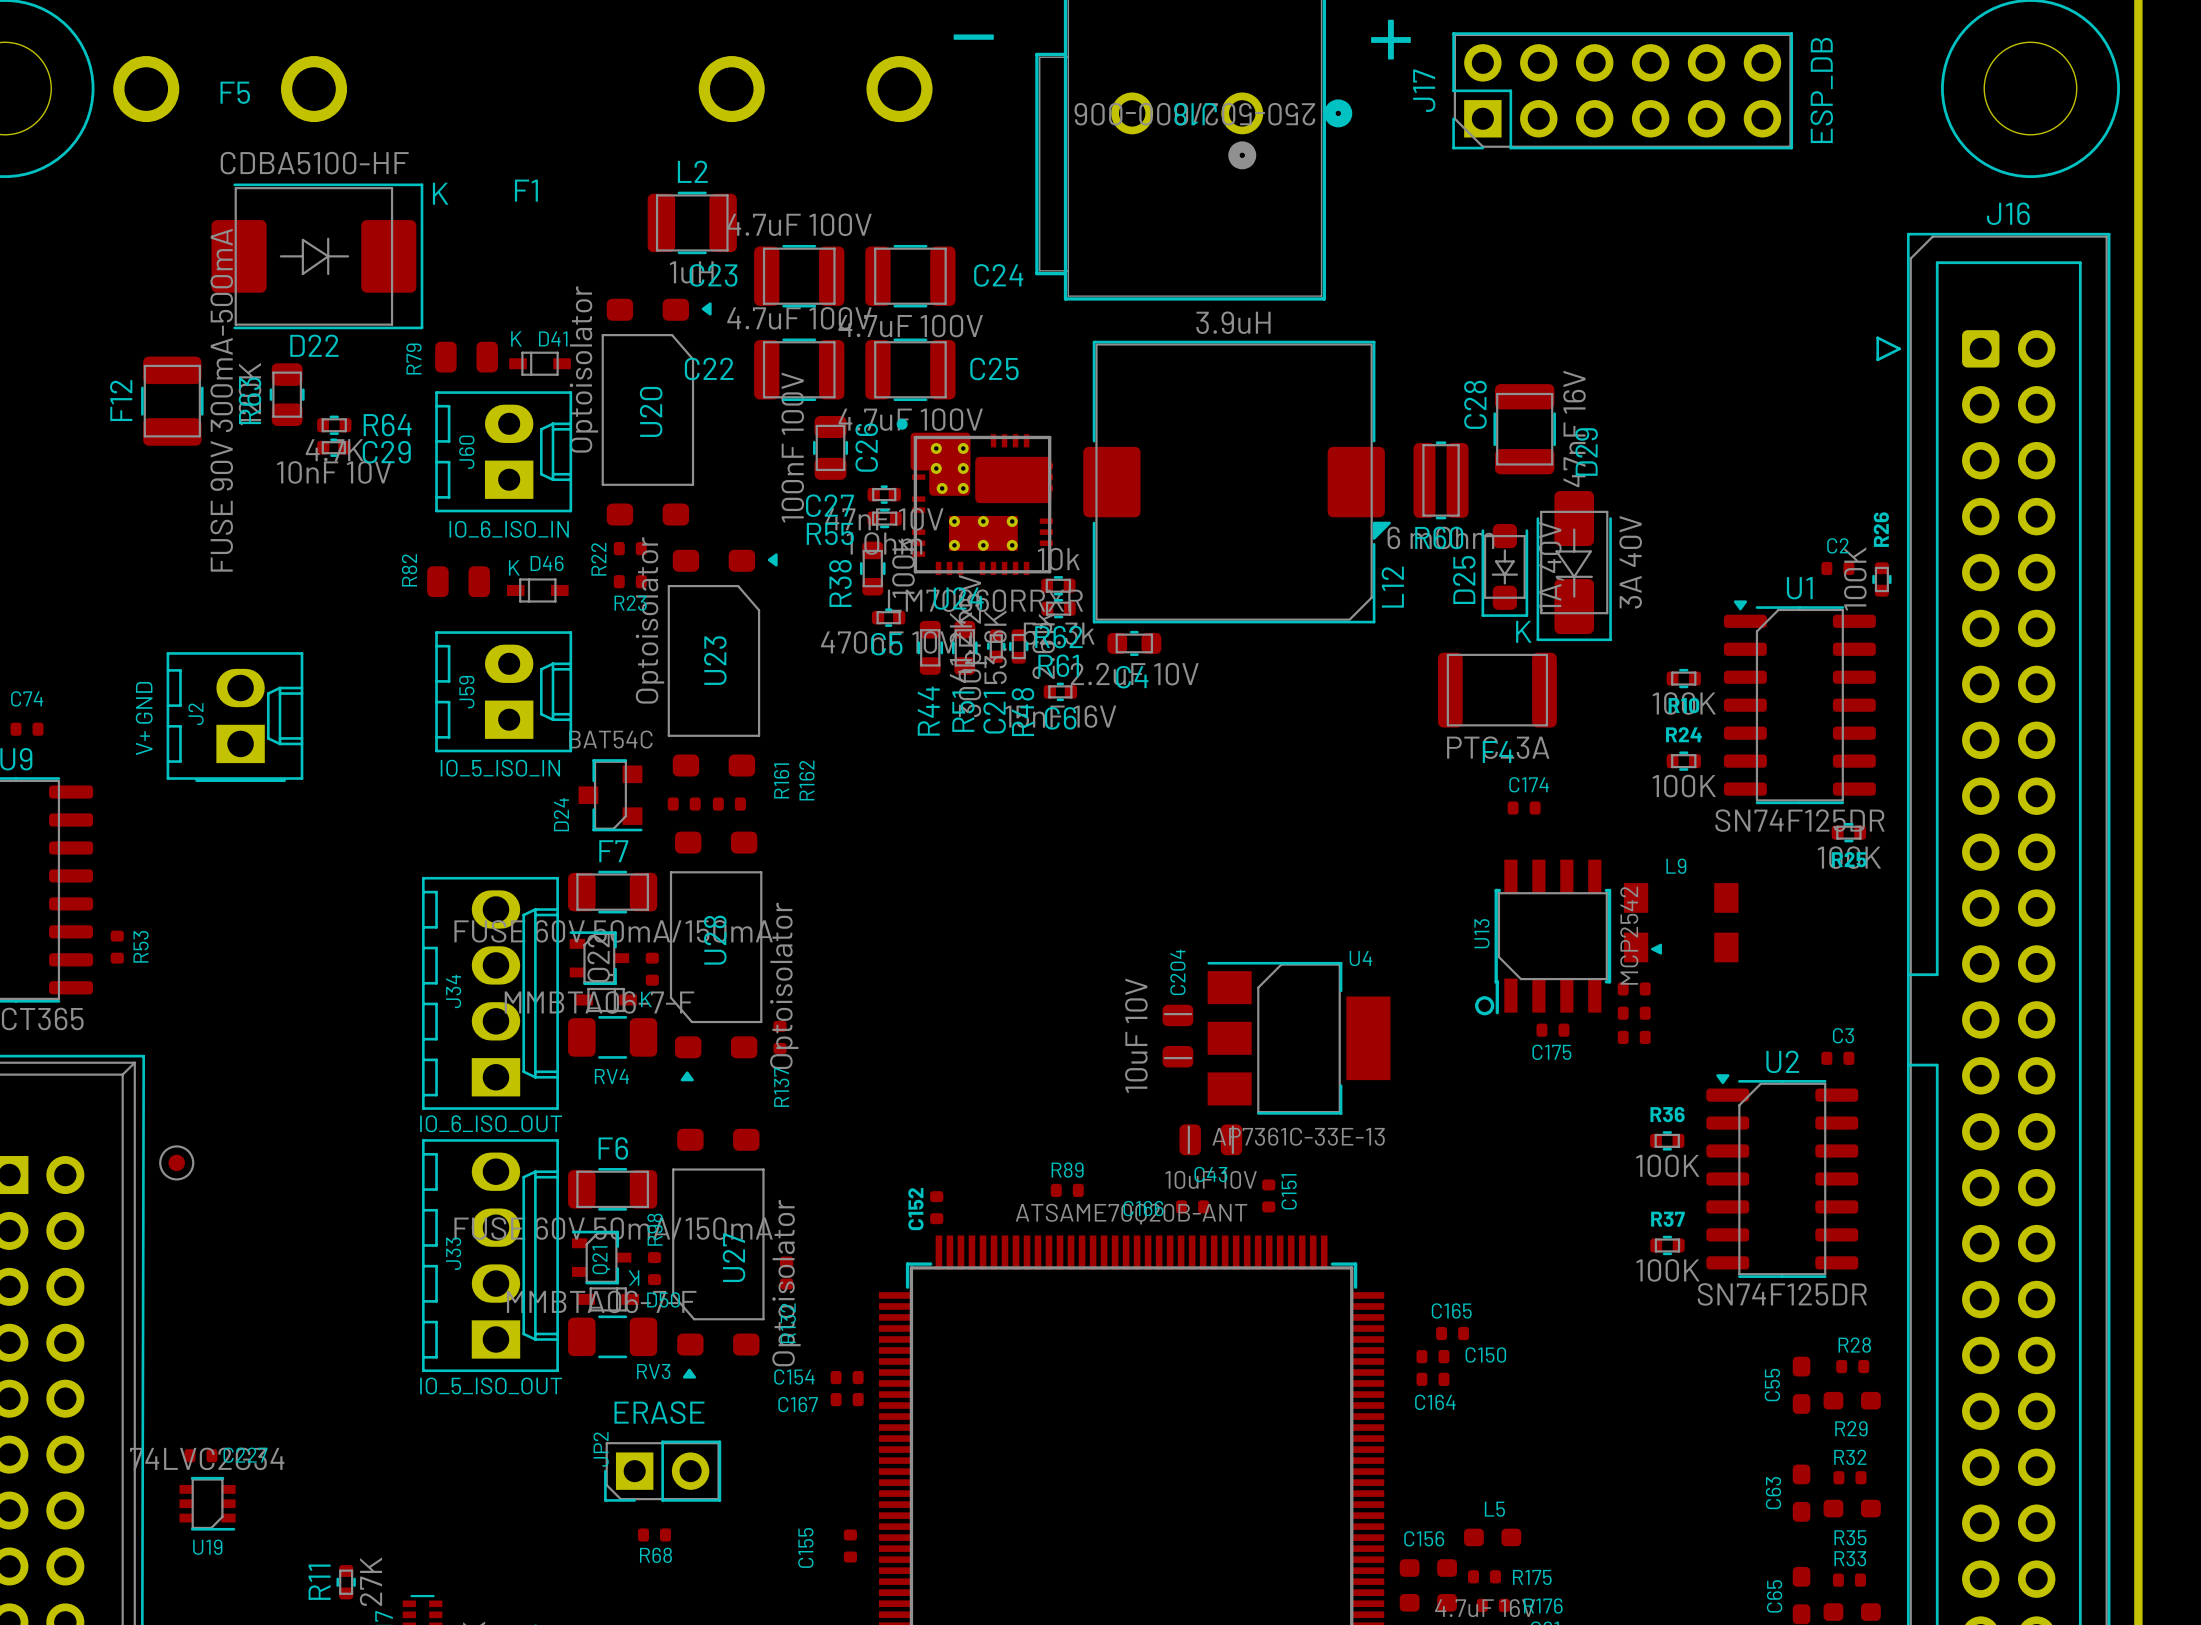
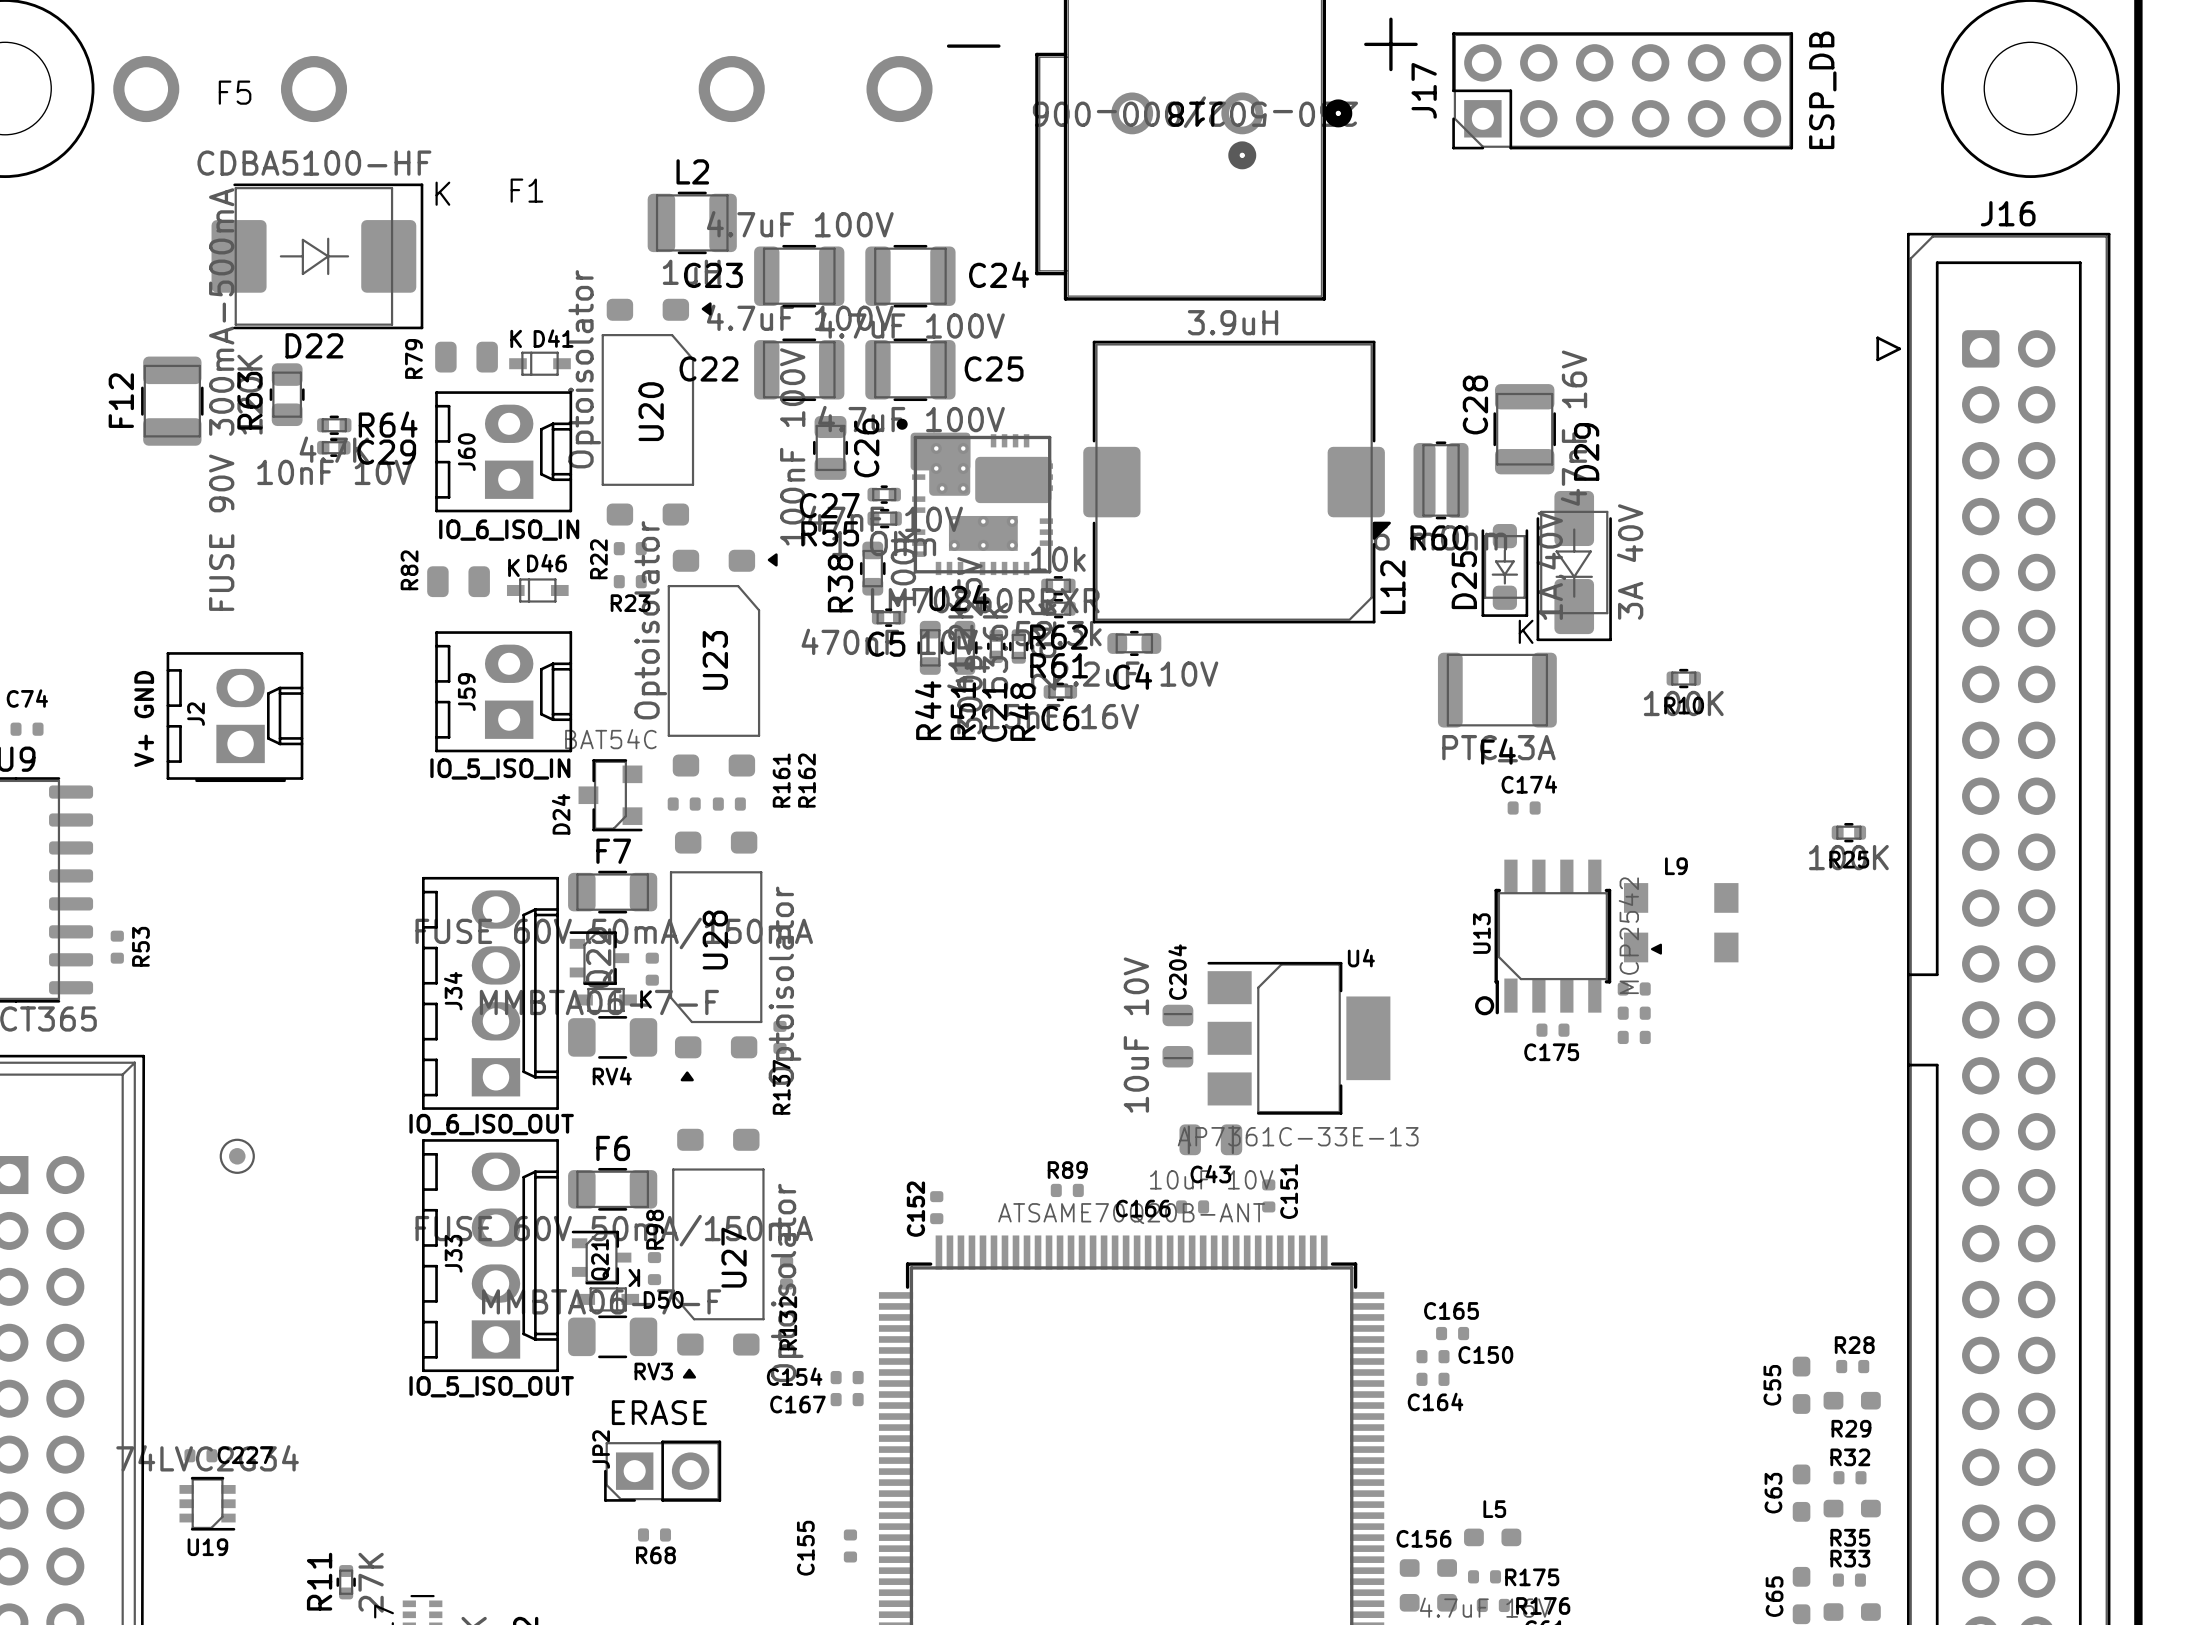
C2: (1837, 568) -> none
R26: 100K (1881, 579) -> none
U1: SN74F125DR (1799, 702) -> none
R24: 100K (1683, 761) -> none
C3: (1837, 1058) -> none
R36: 100K (1667, 1140) -> none
part position: (176, 1162) -> (237, 1156)
U2: SN74F125DR (1782, 1176) -> none
R37: 100K (1667, 1245) -> none

